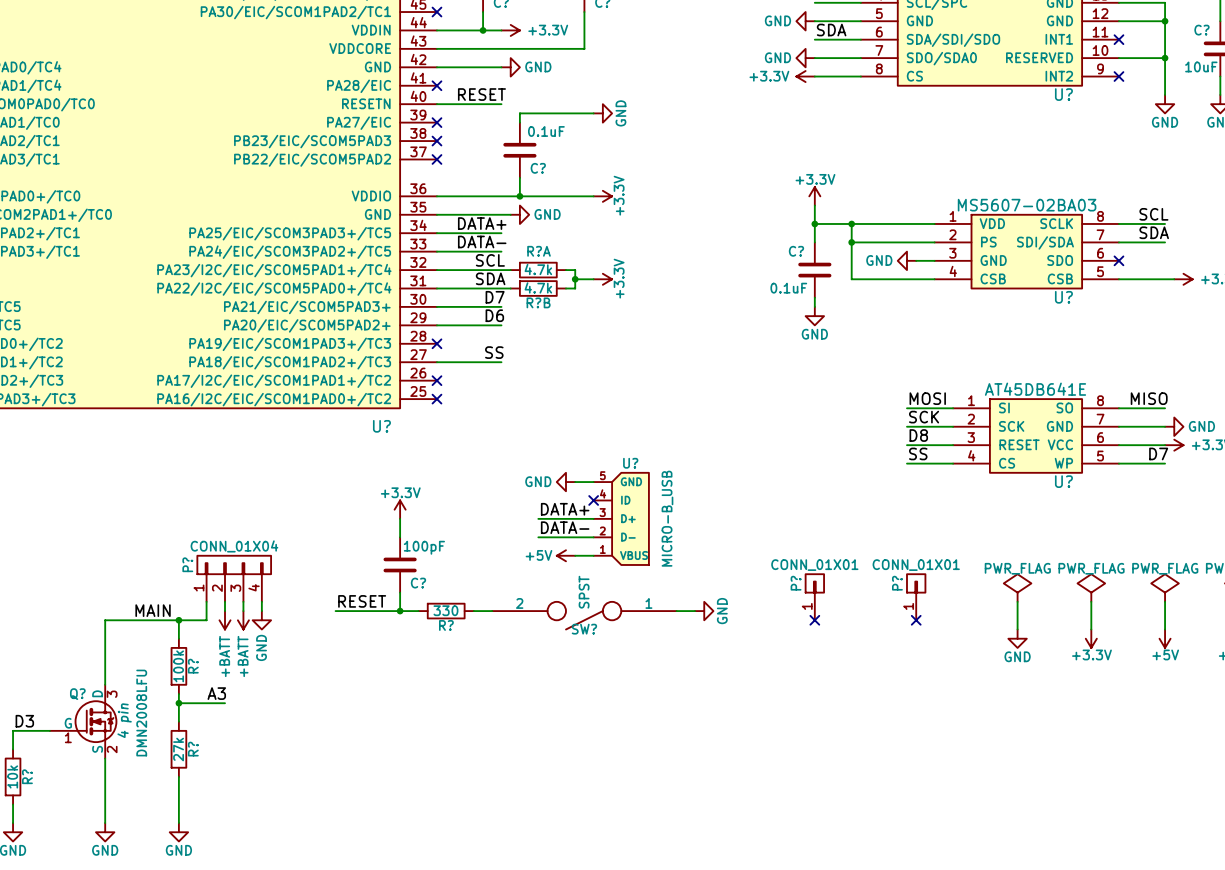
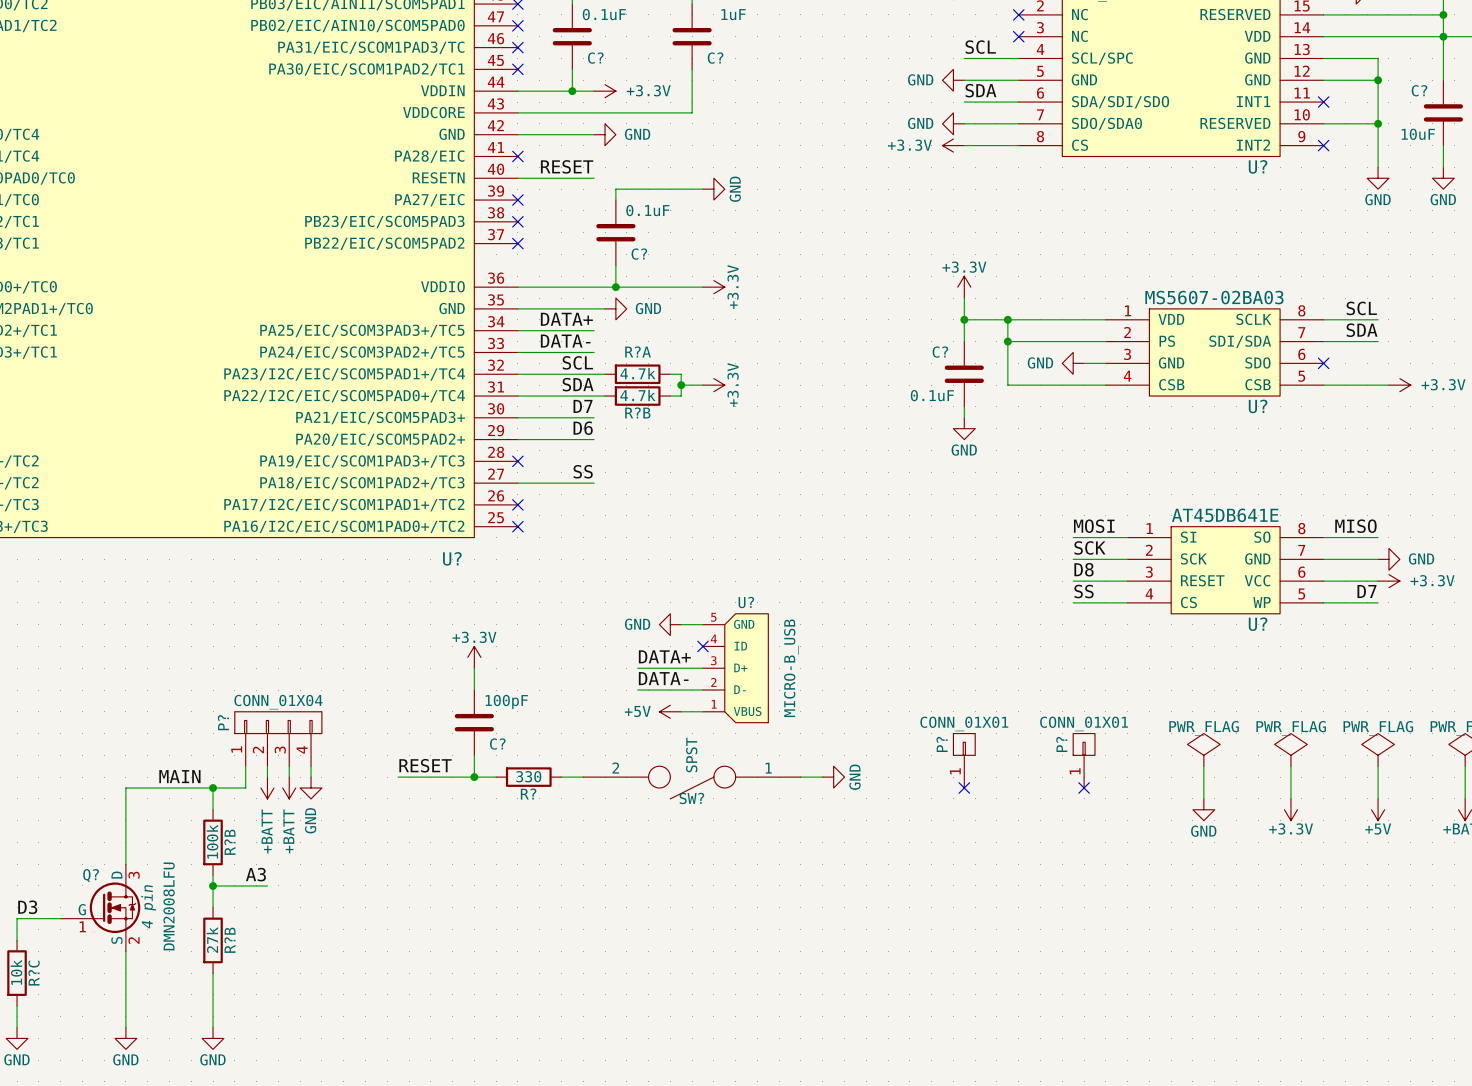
R? name: R? (193, 666) -> R?B (229, 842)
R? name: R? (193, 749) -> R?B (229, 940)
R? name: R? (27, 776) -> R?C (34, 973)

